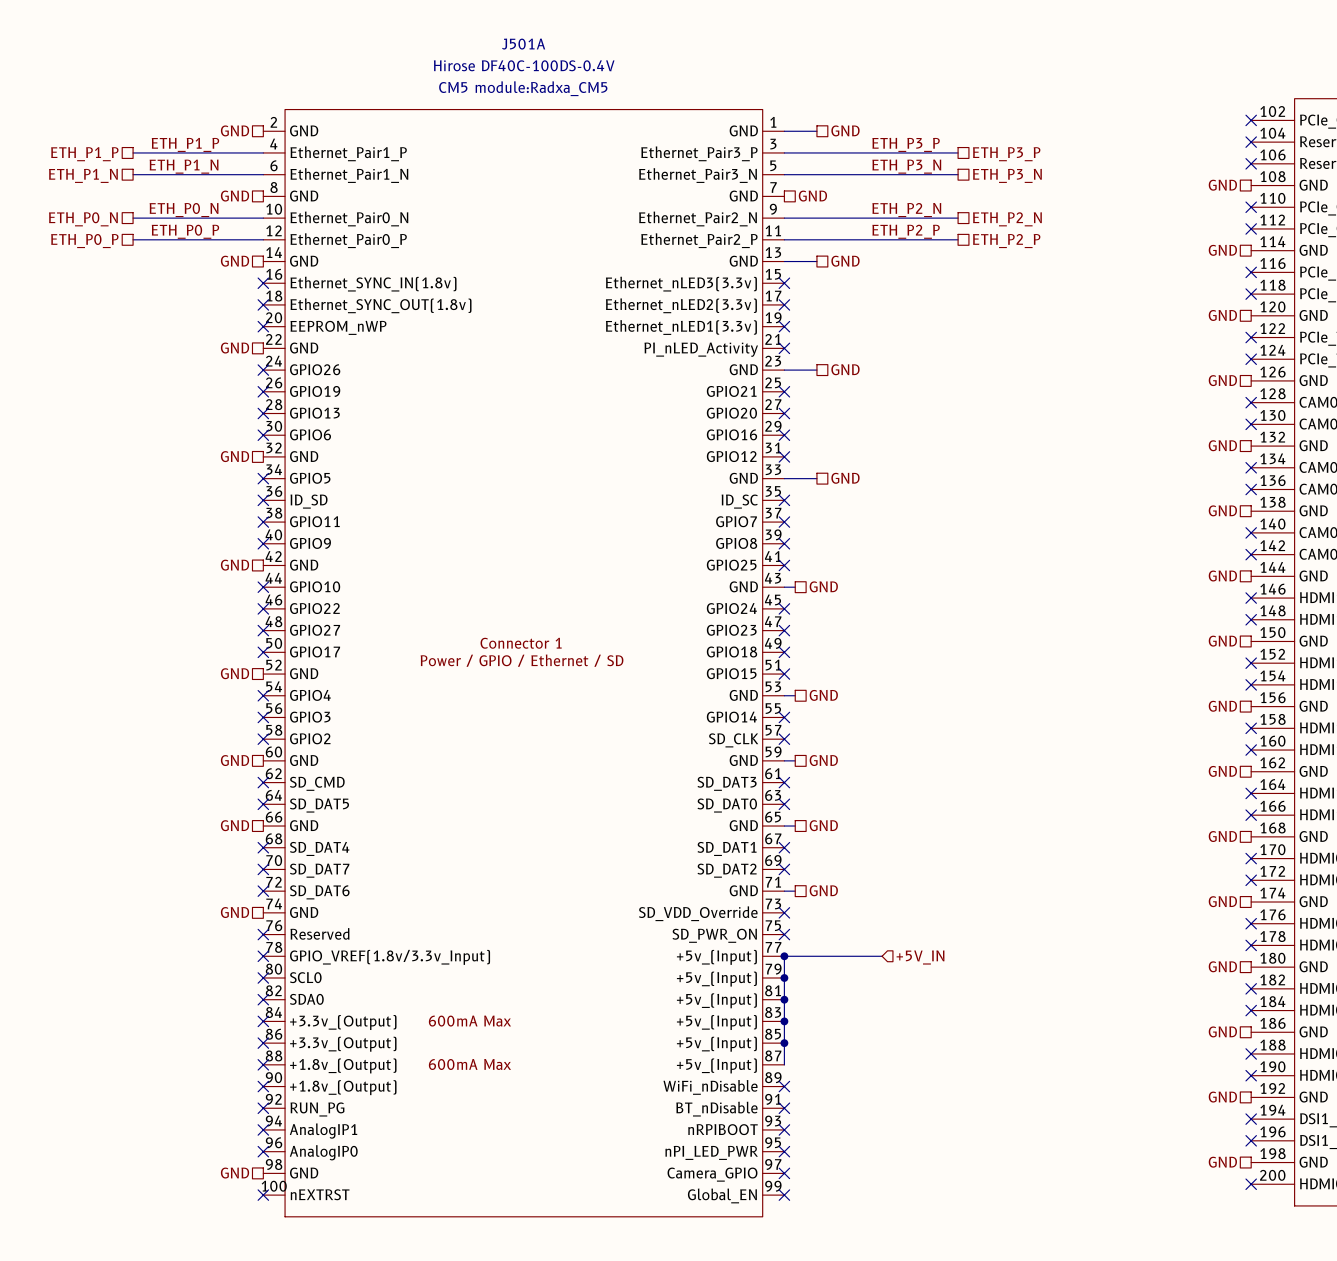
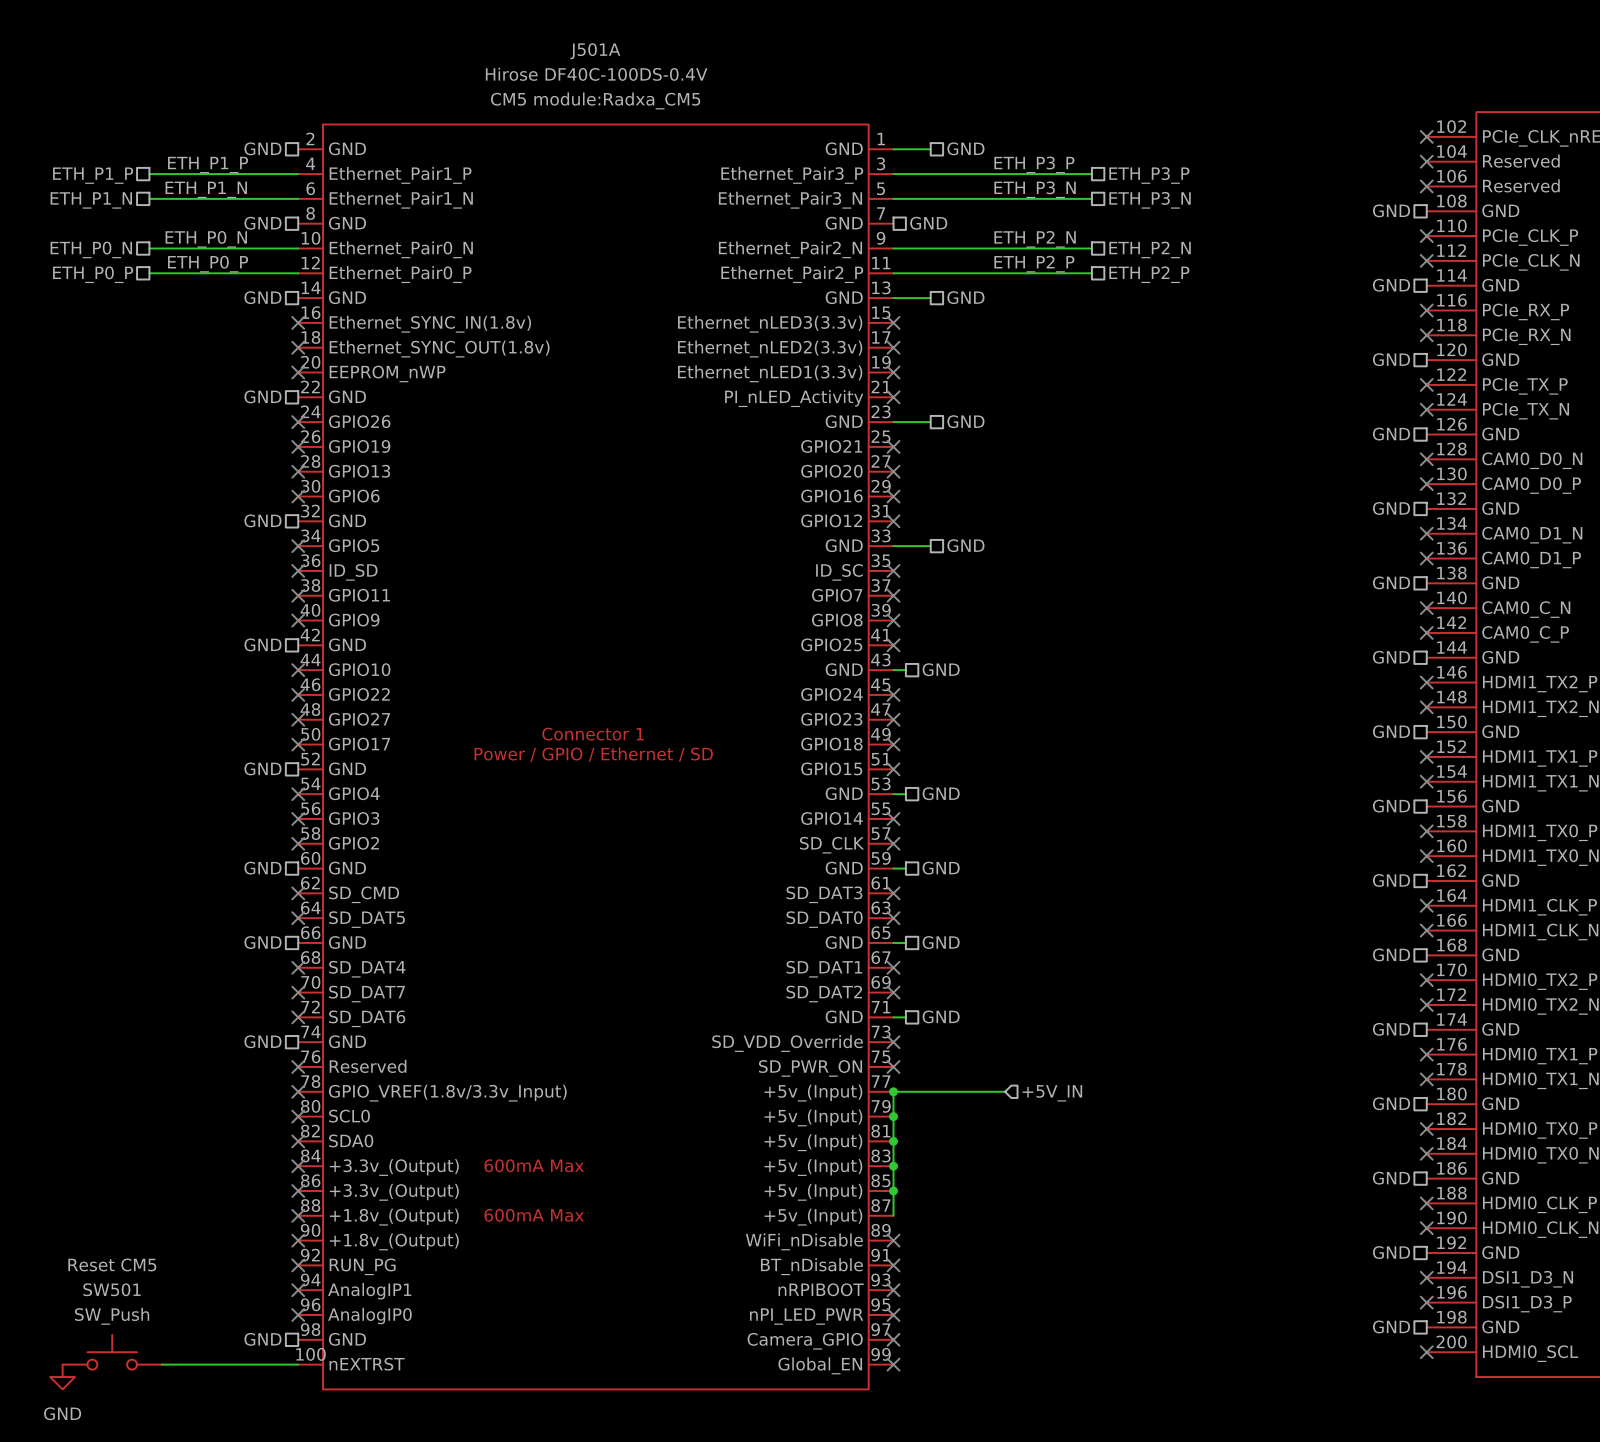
SW501: none -> SW_Push (112, 1352)
wire: none -> (161, 1364) (298, 1364)
no-connect mark: (263, 1195) -> none
power symbol: none -> GND (62, 1377)

